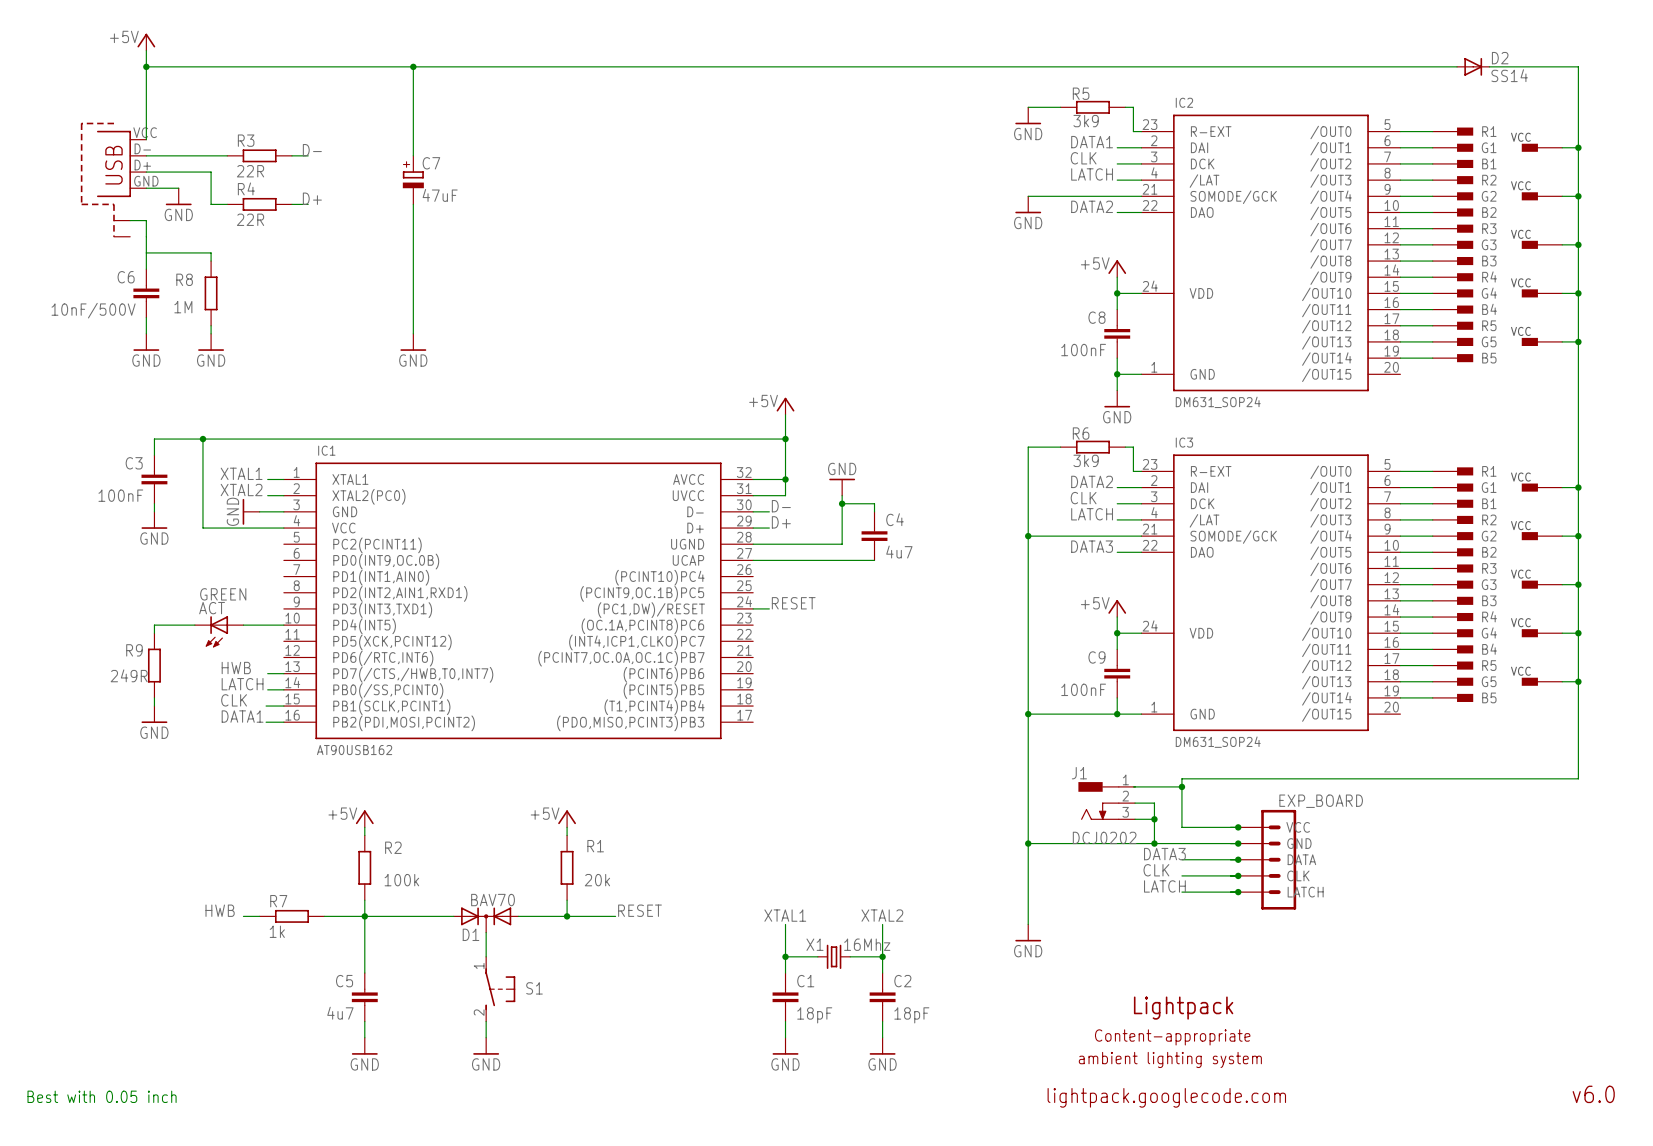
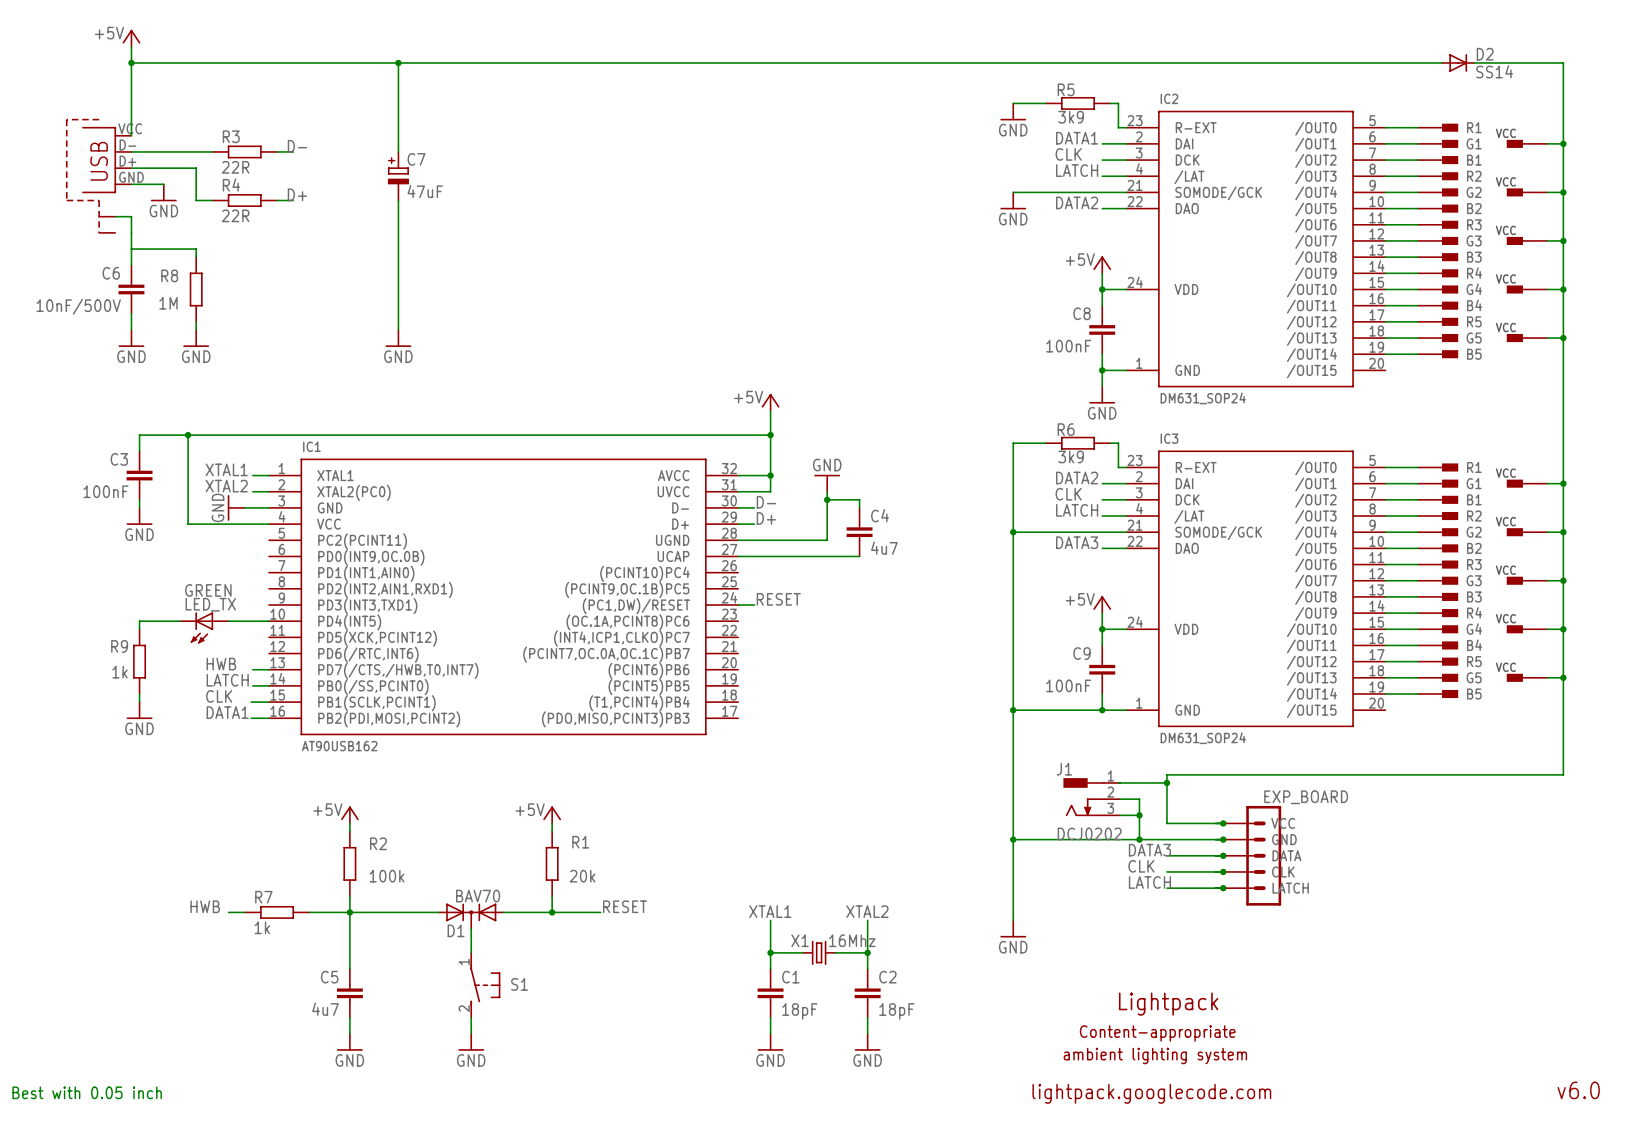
ACT name: ACT (212, 608) -> LED_TX (210, 604)
R9 value: 249R (129, 675) -> 1k (120, 672)

